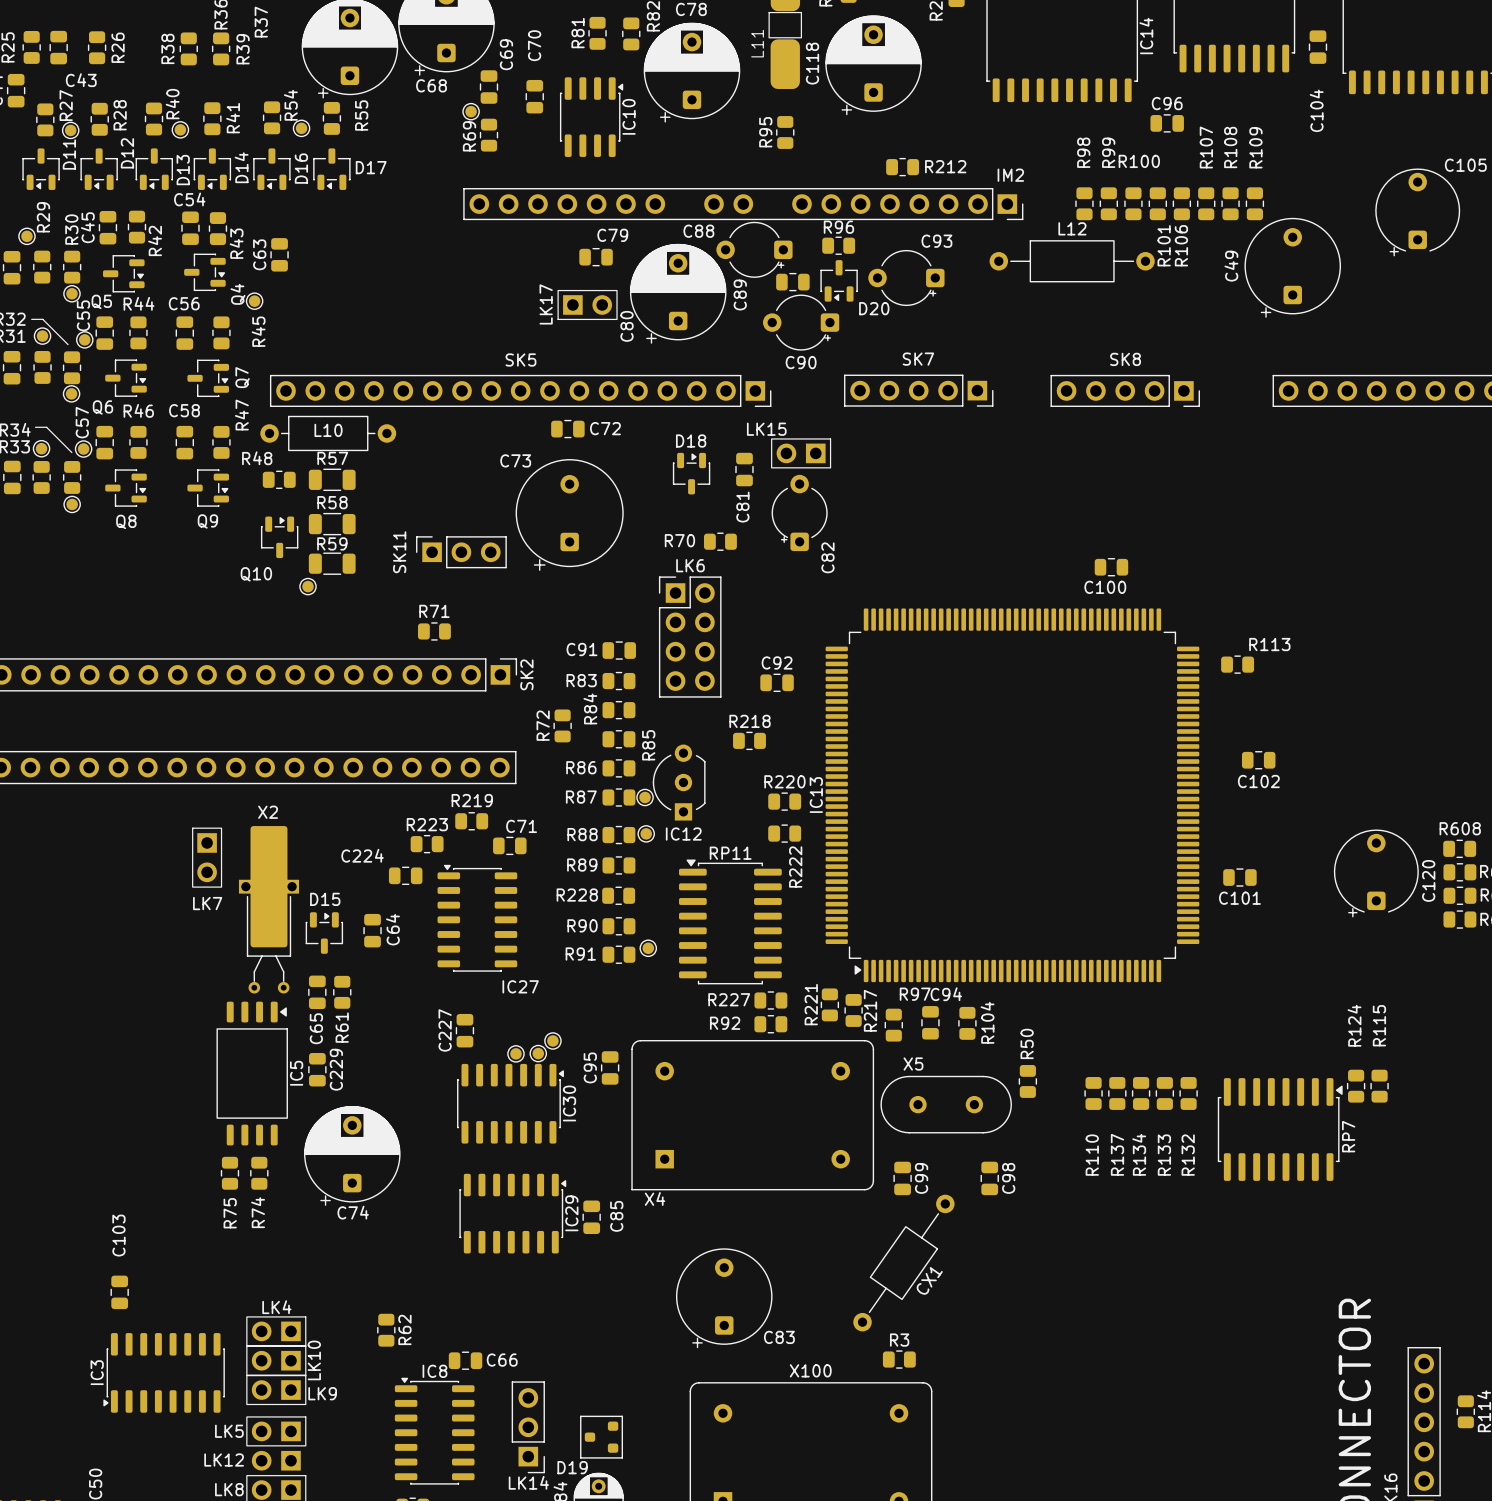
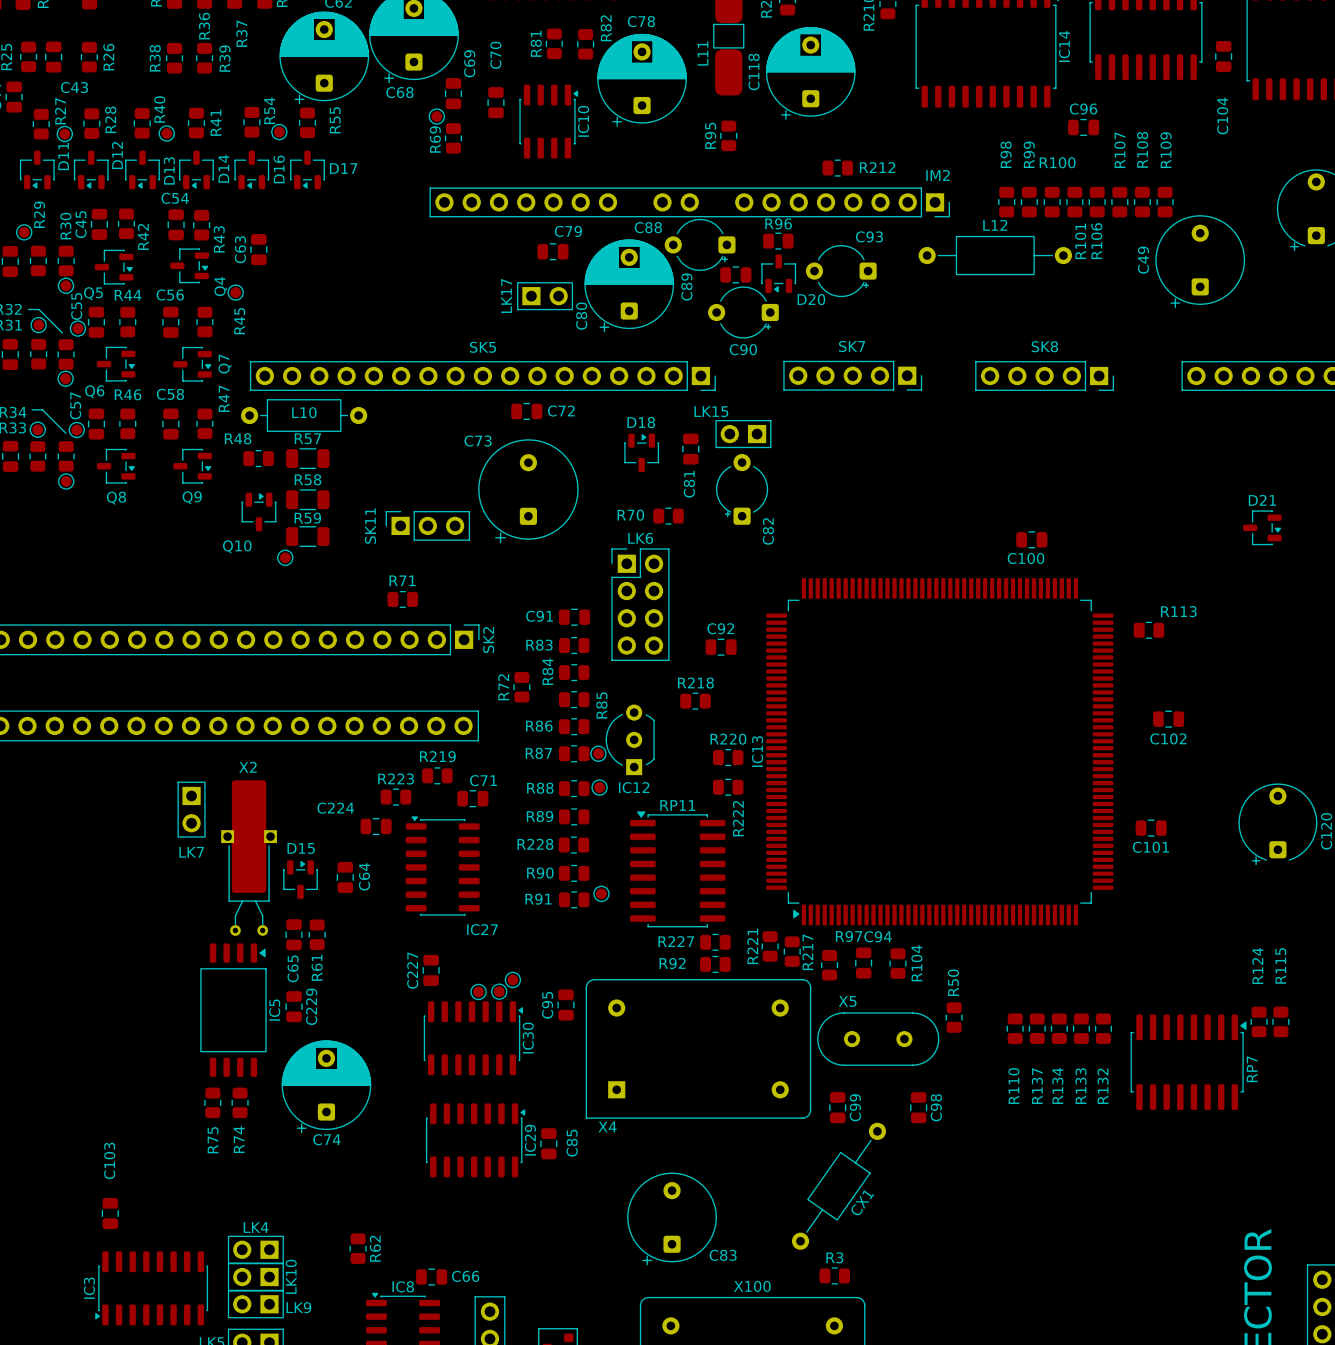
D21: none -> (1262, 527)

